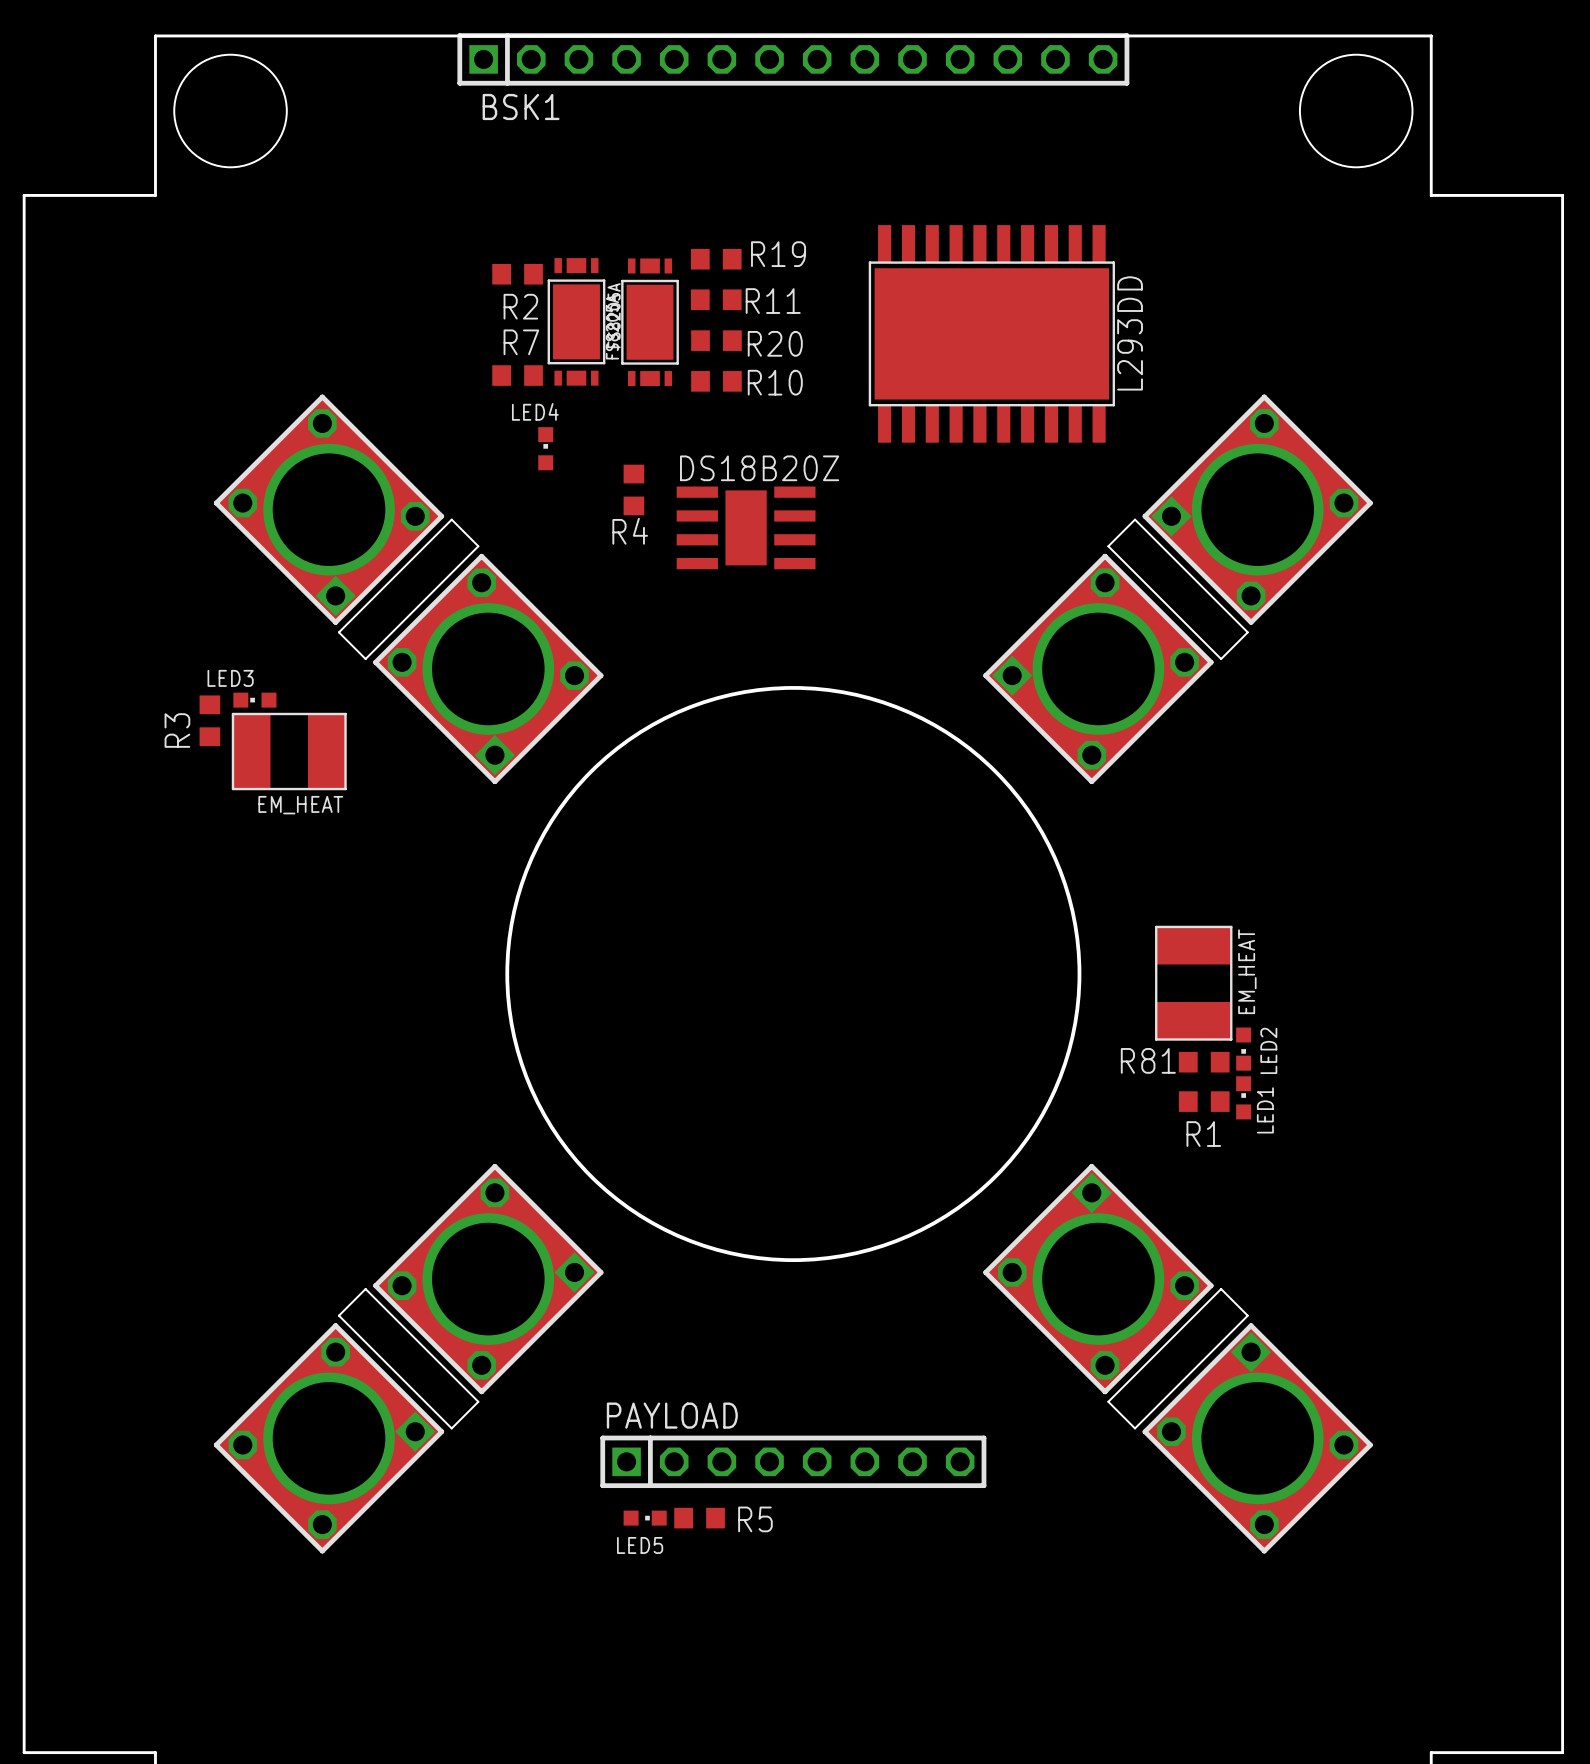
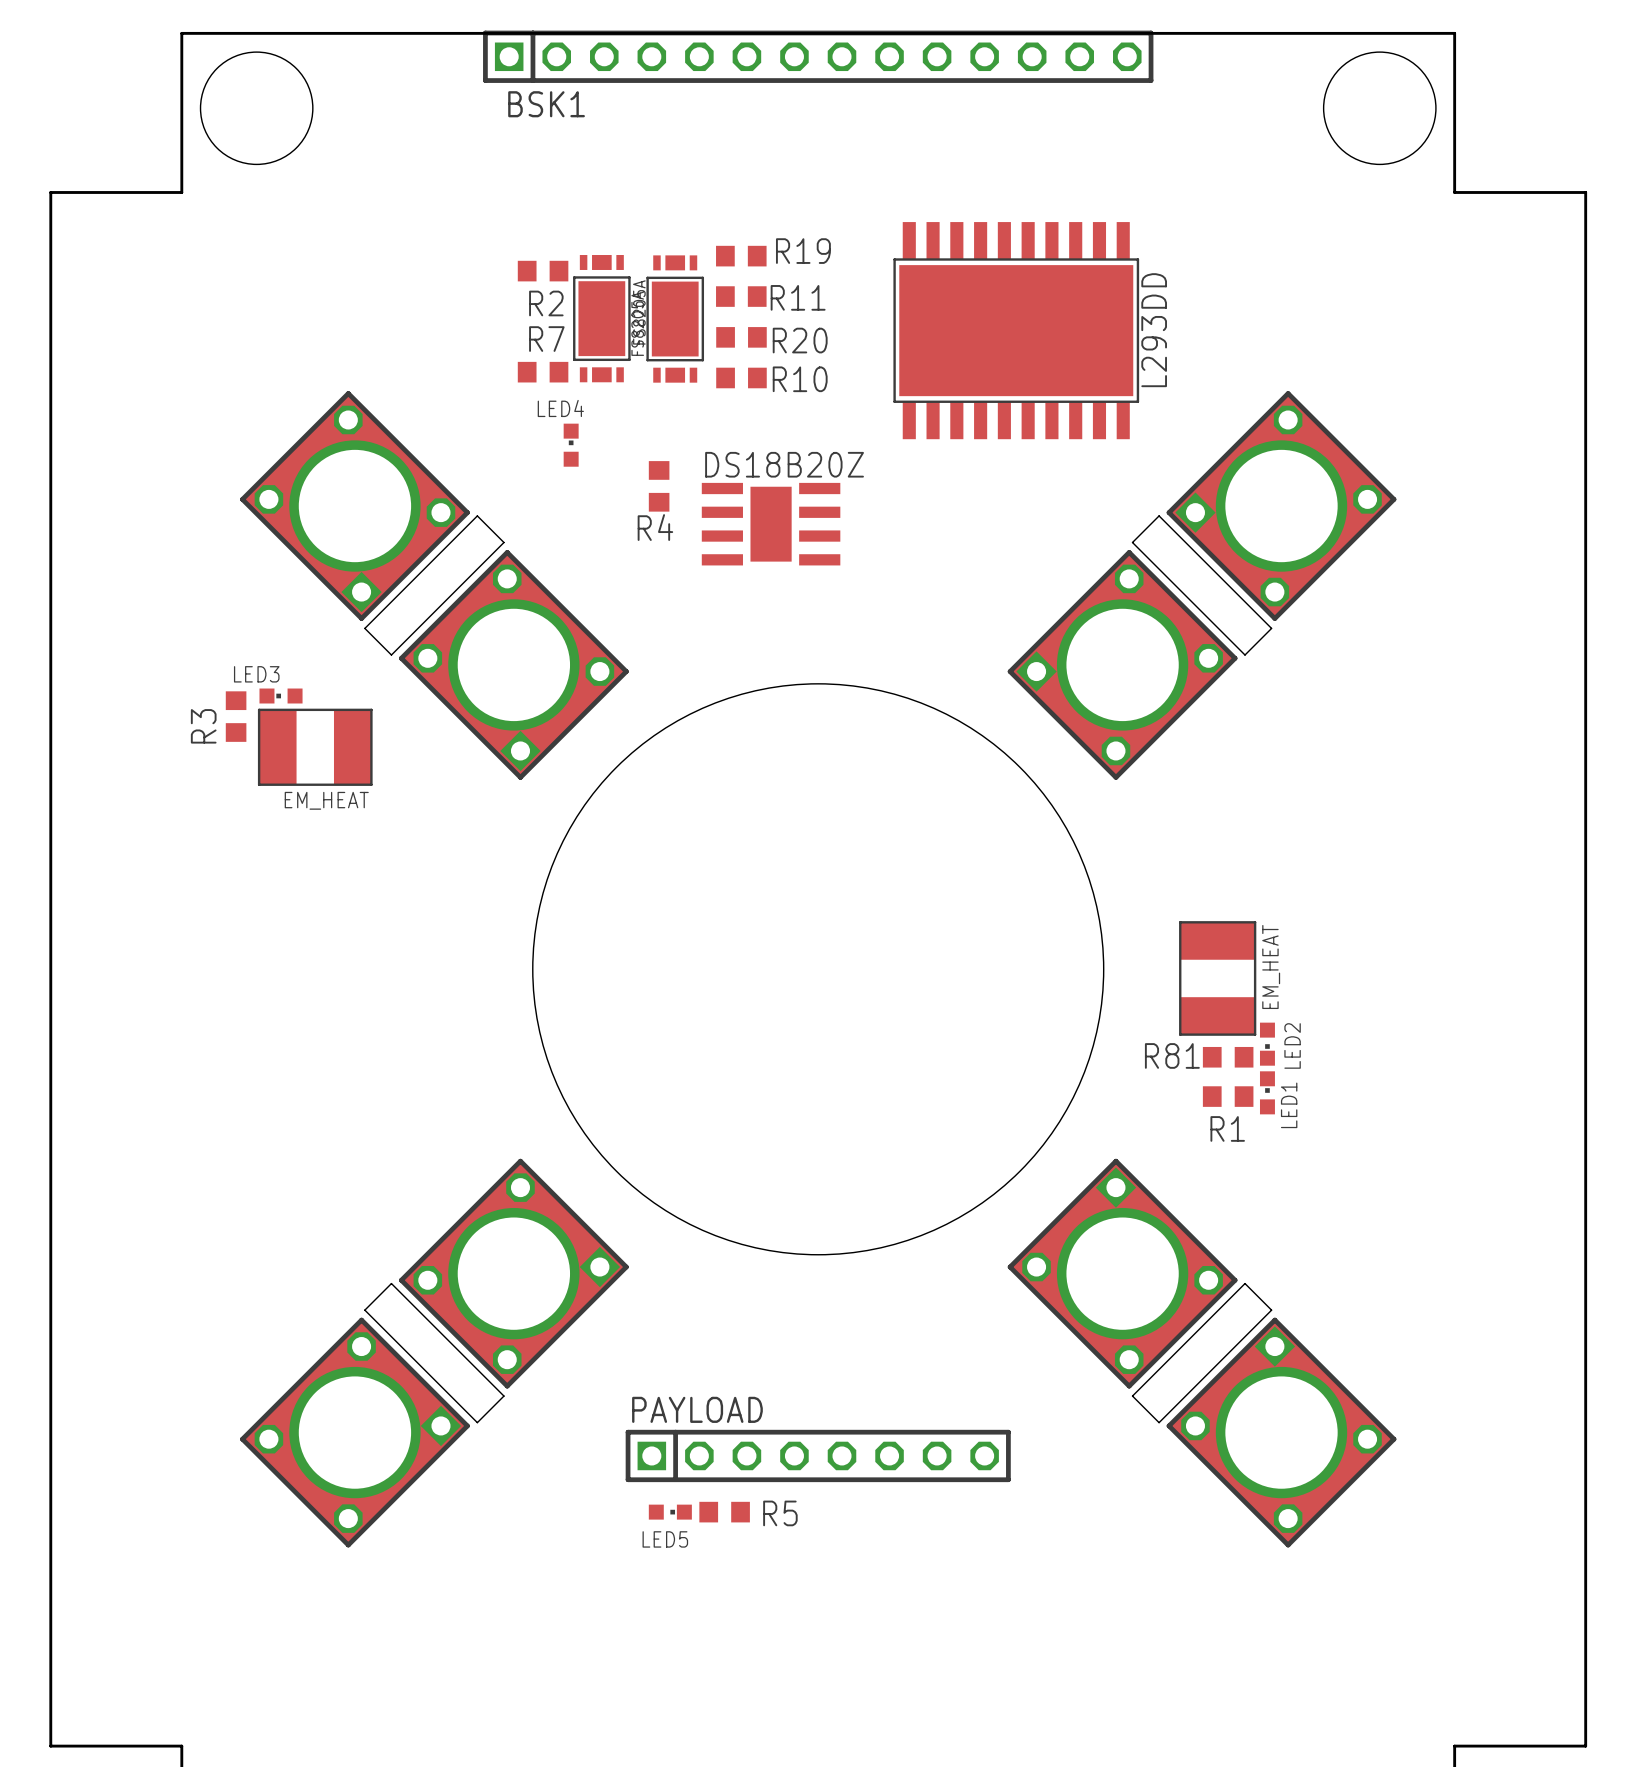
round board edge: [505, 686, 1082, 1263] -> none

